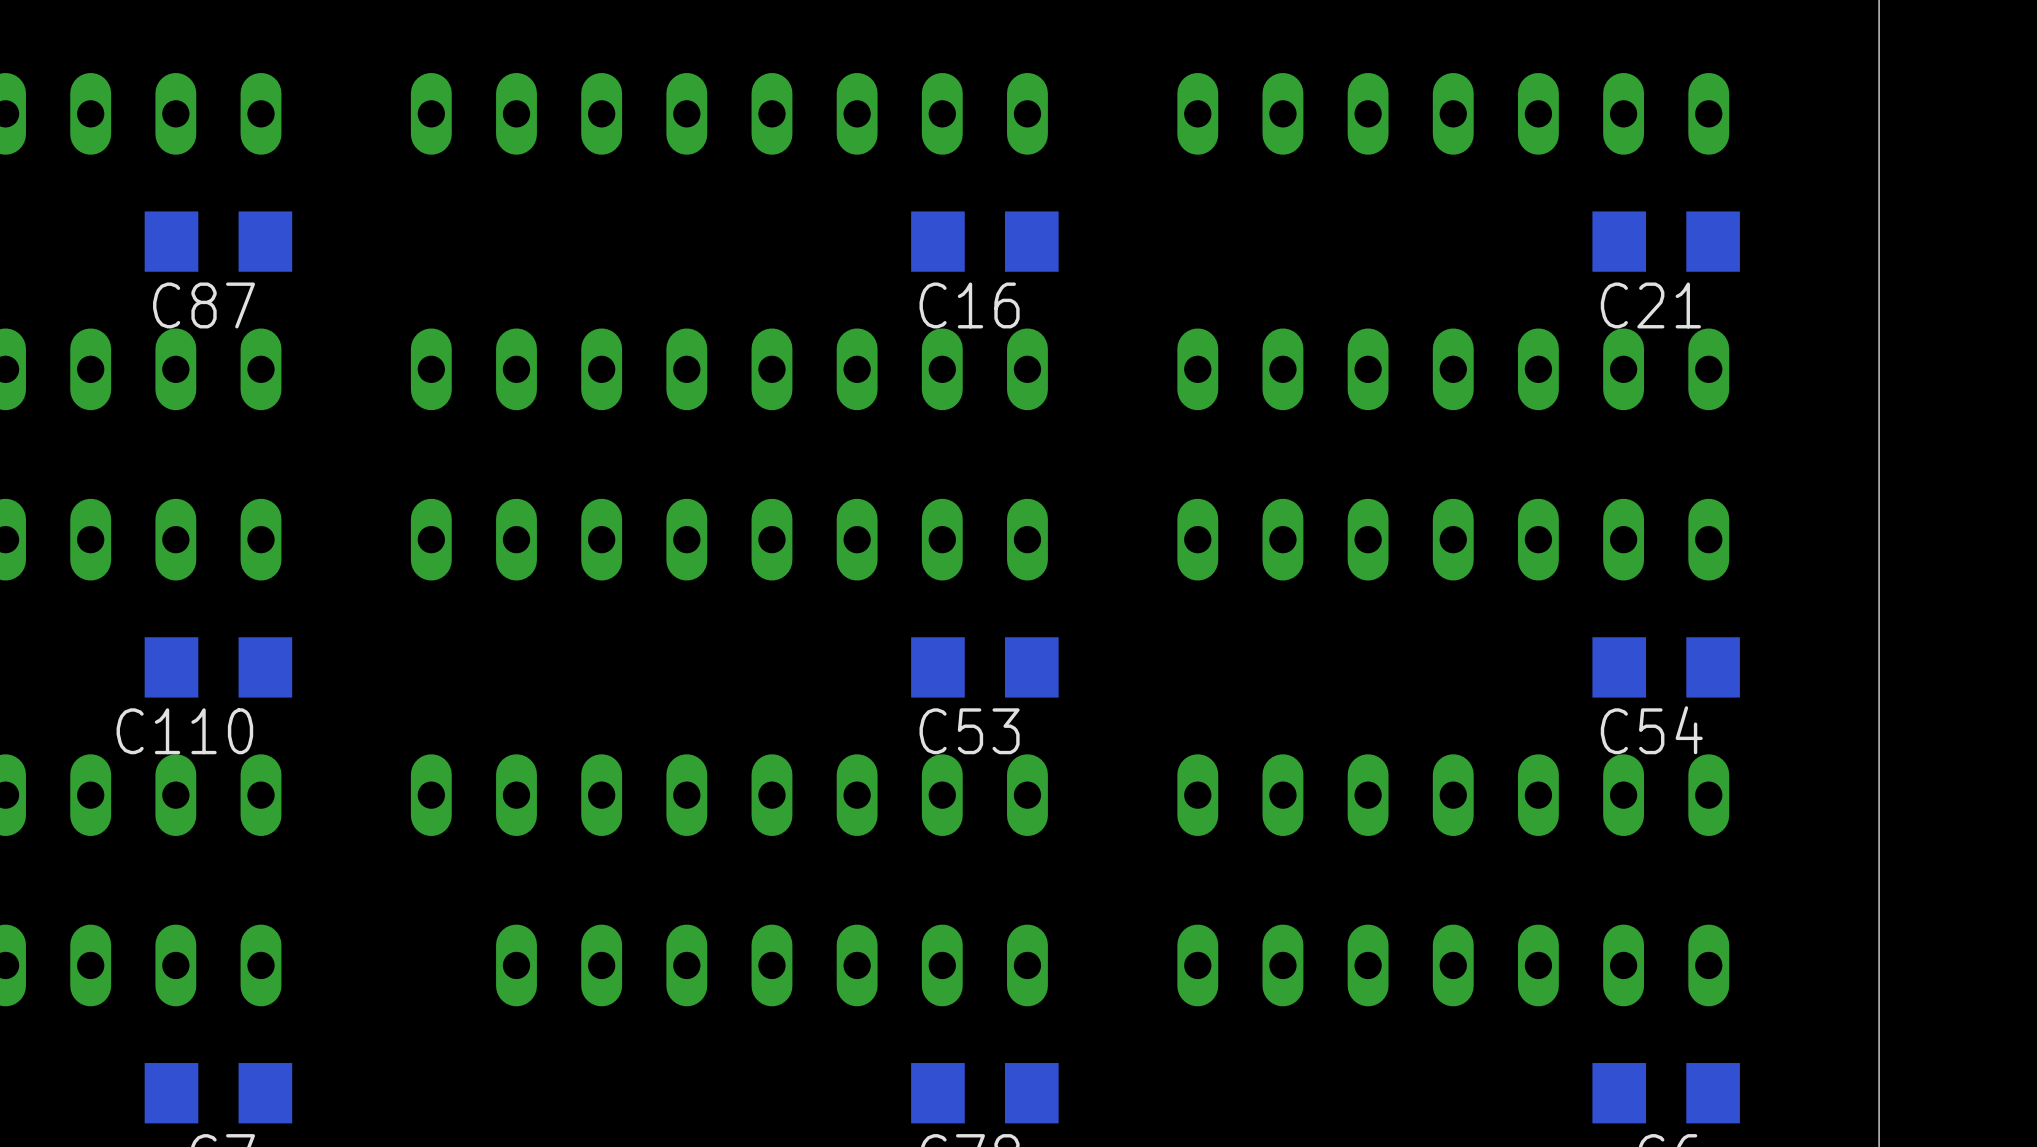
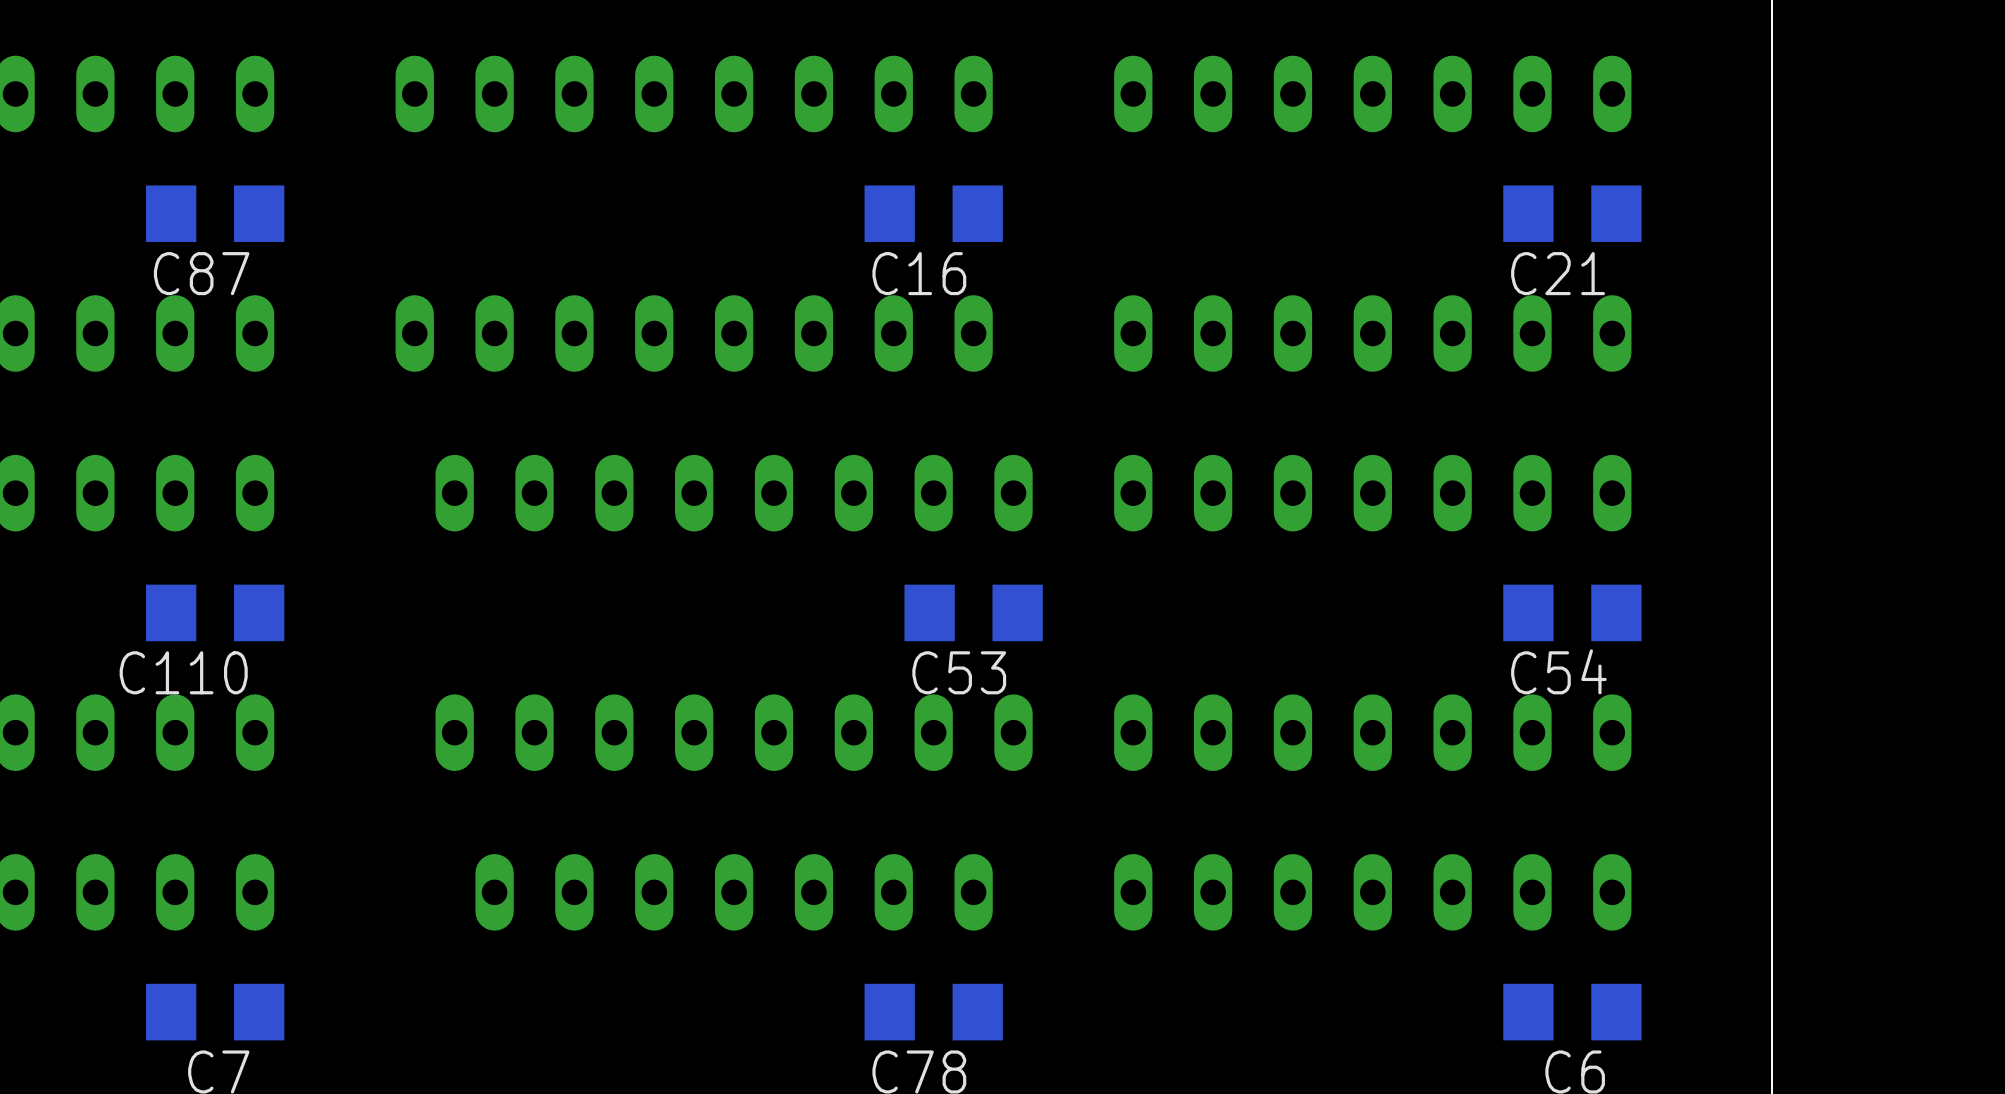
part position: (729, 667) -> (734, 612)
C53 position: (984, 667) -> (973, 612)

